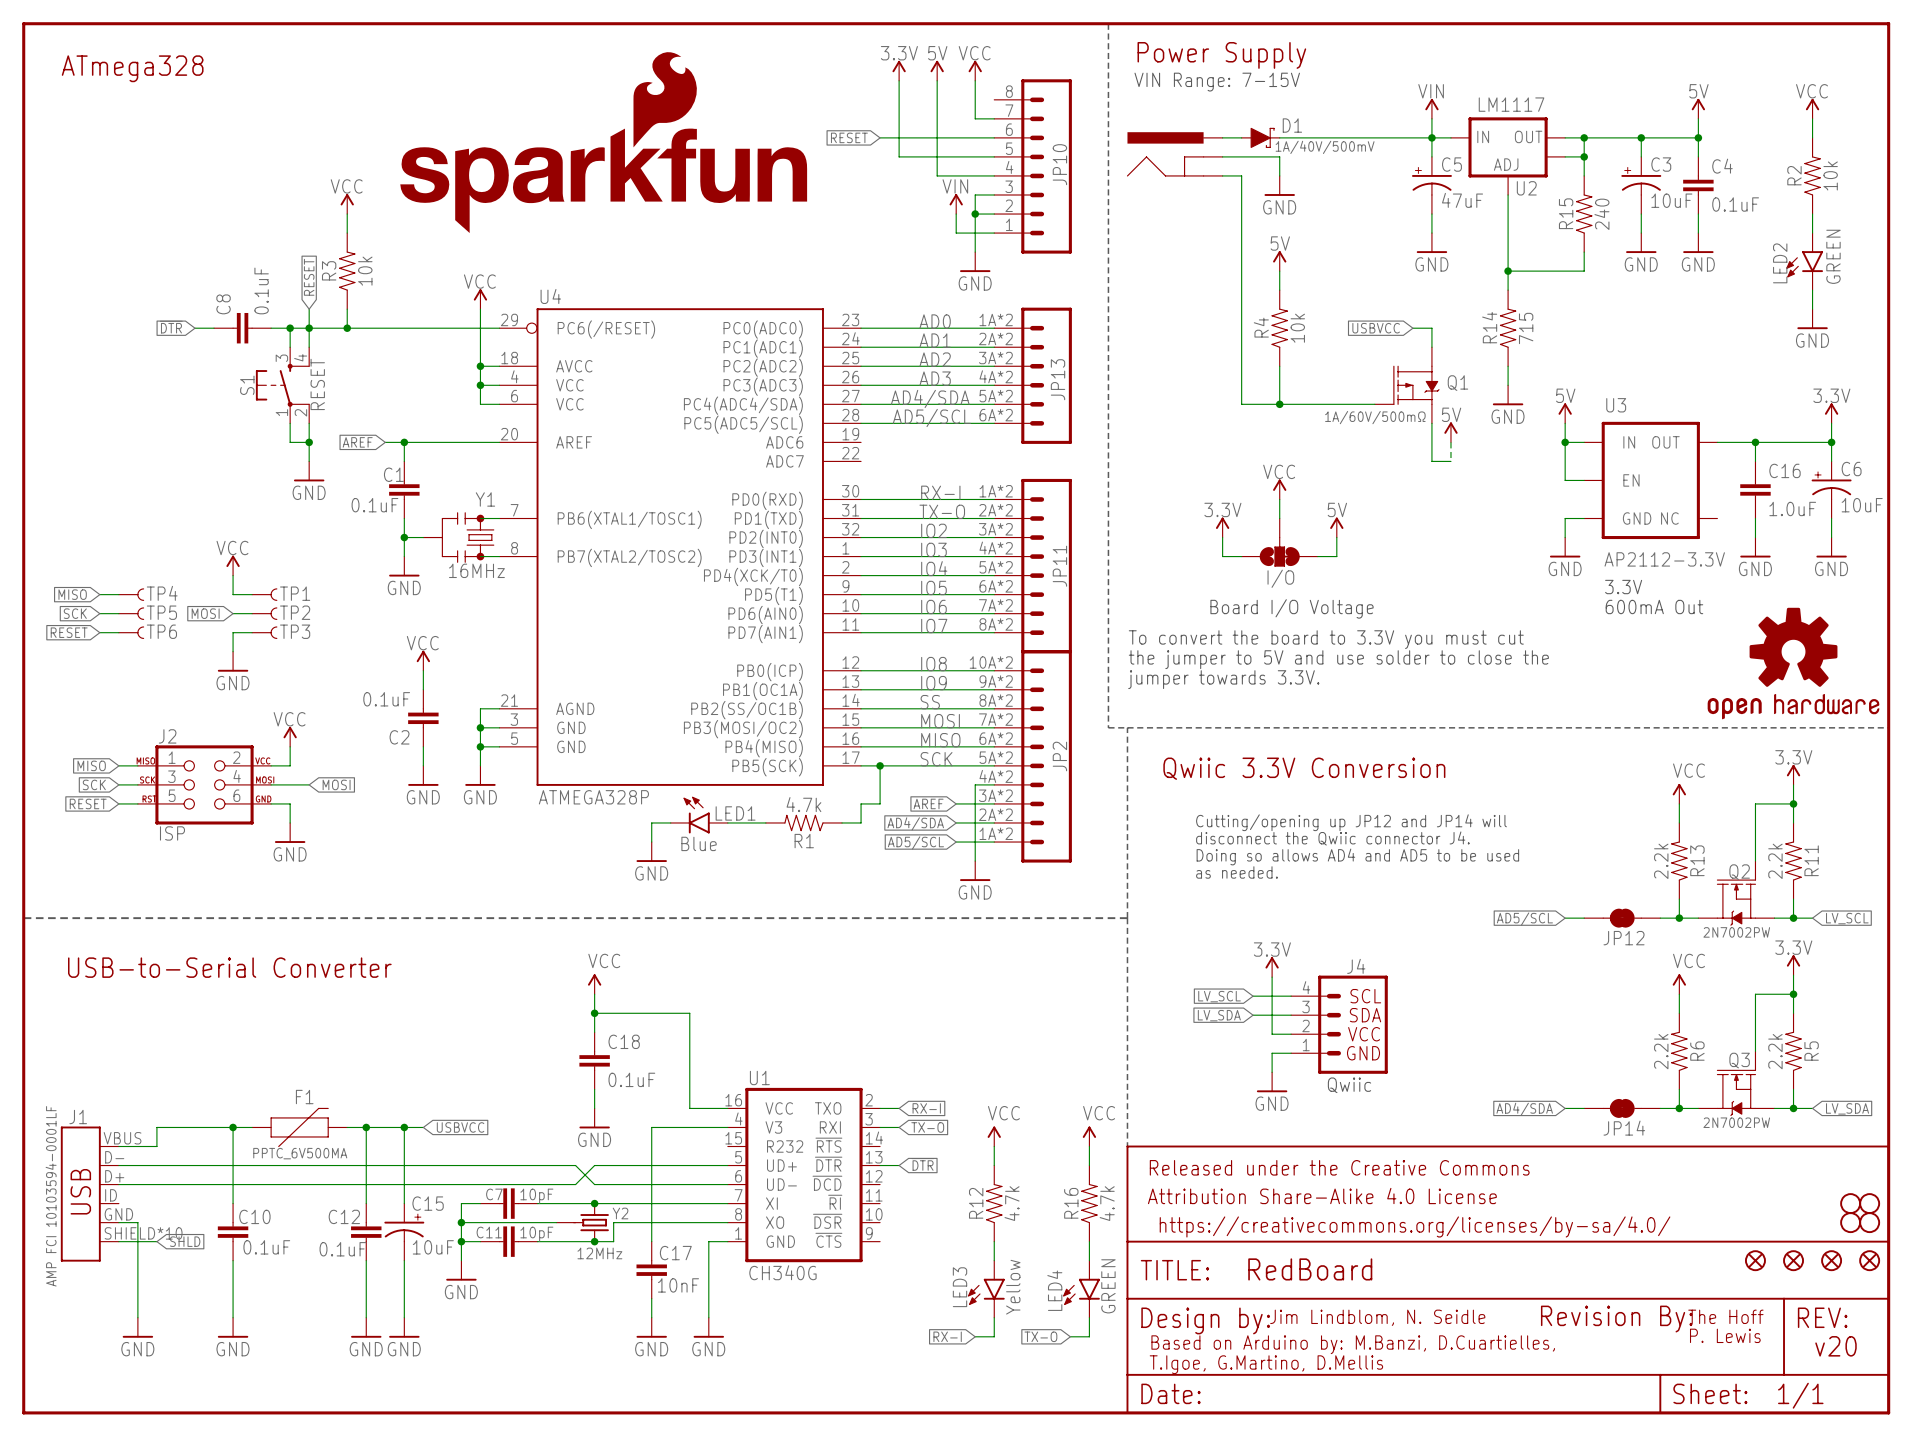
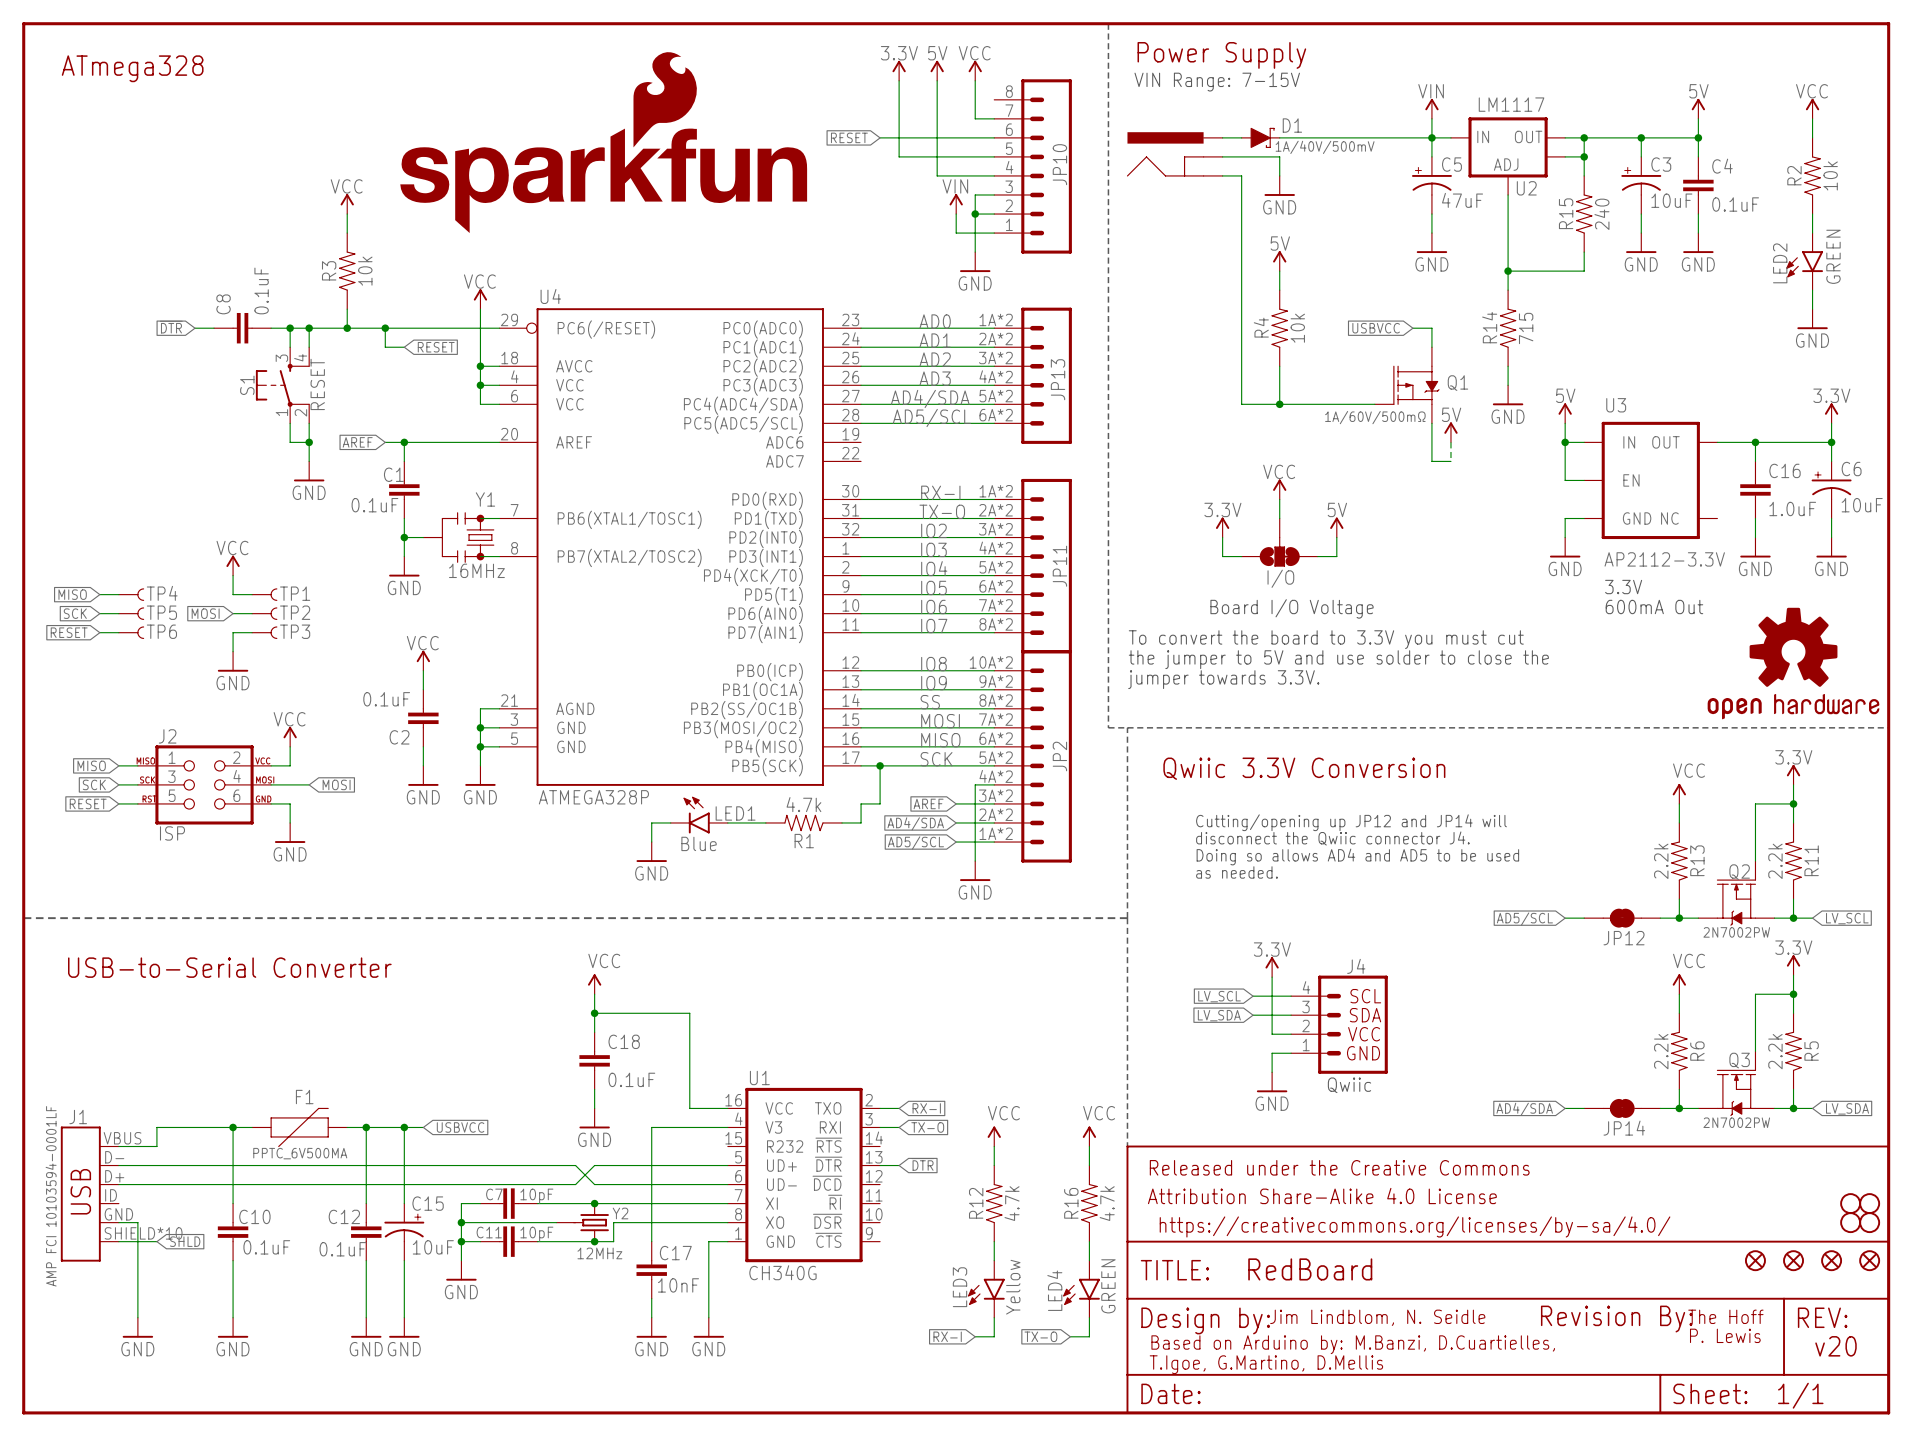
global label rotation: 0° (309, 277) -> 90° clockwise (436, 347)
global label position: RESET (309, 277) -> RESET (436, 347)
wire: (309, 309) (309, 328) -> none
wire: none -> (385, 328) (385, 347) (404, 347)
junction: none -> (385, 328)

